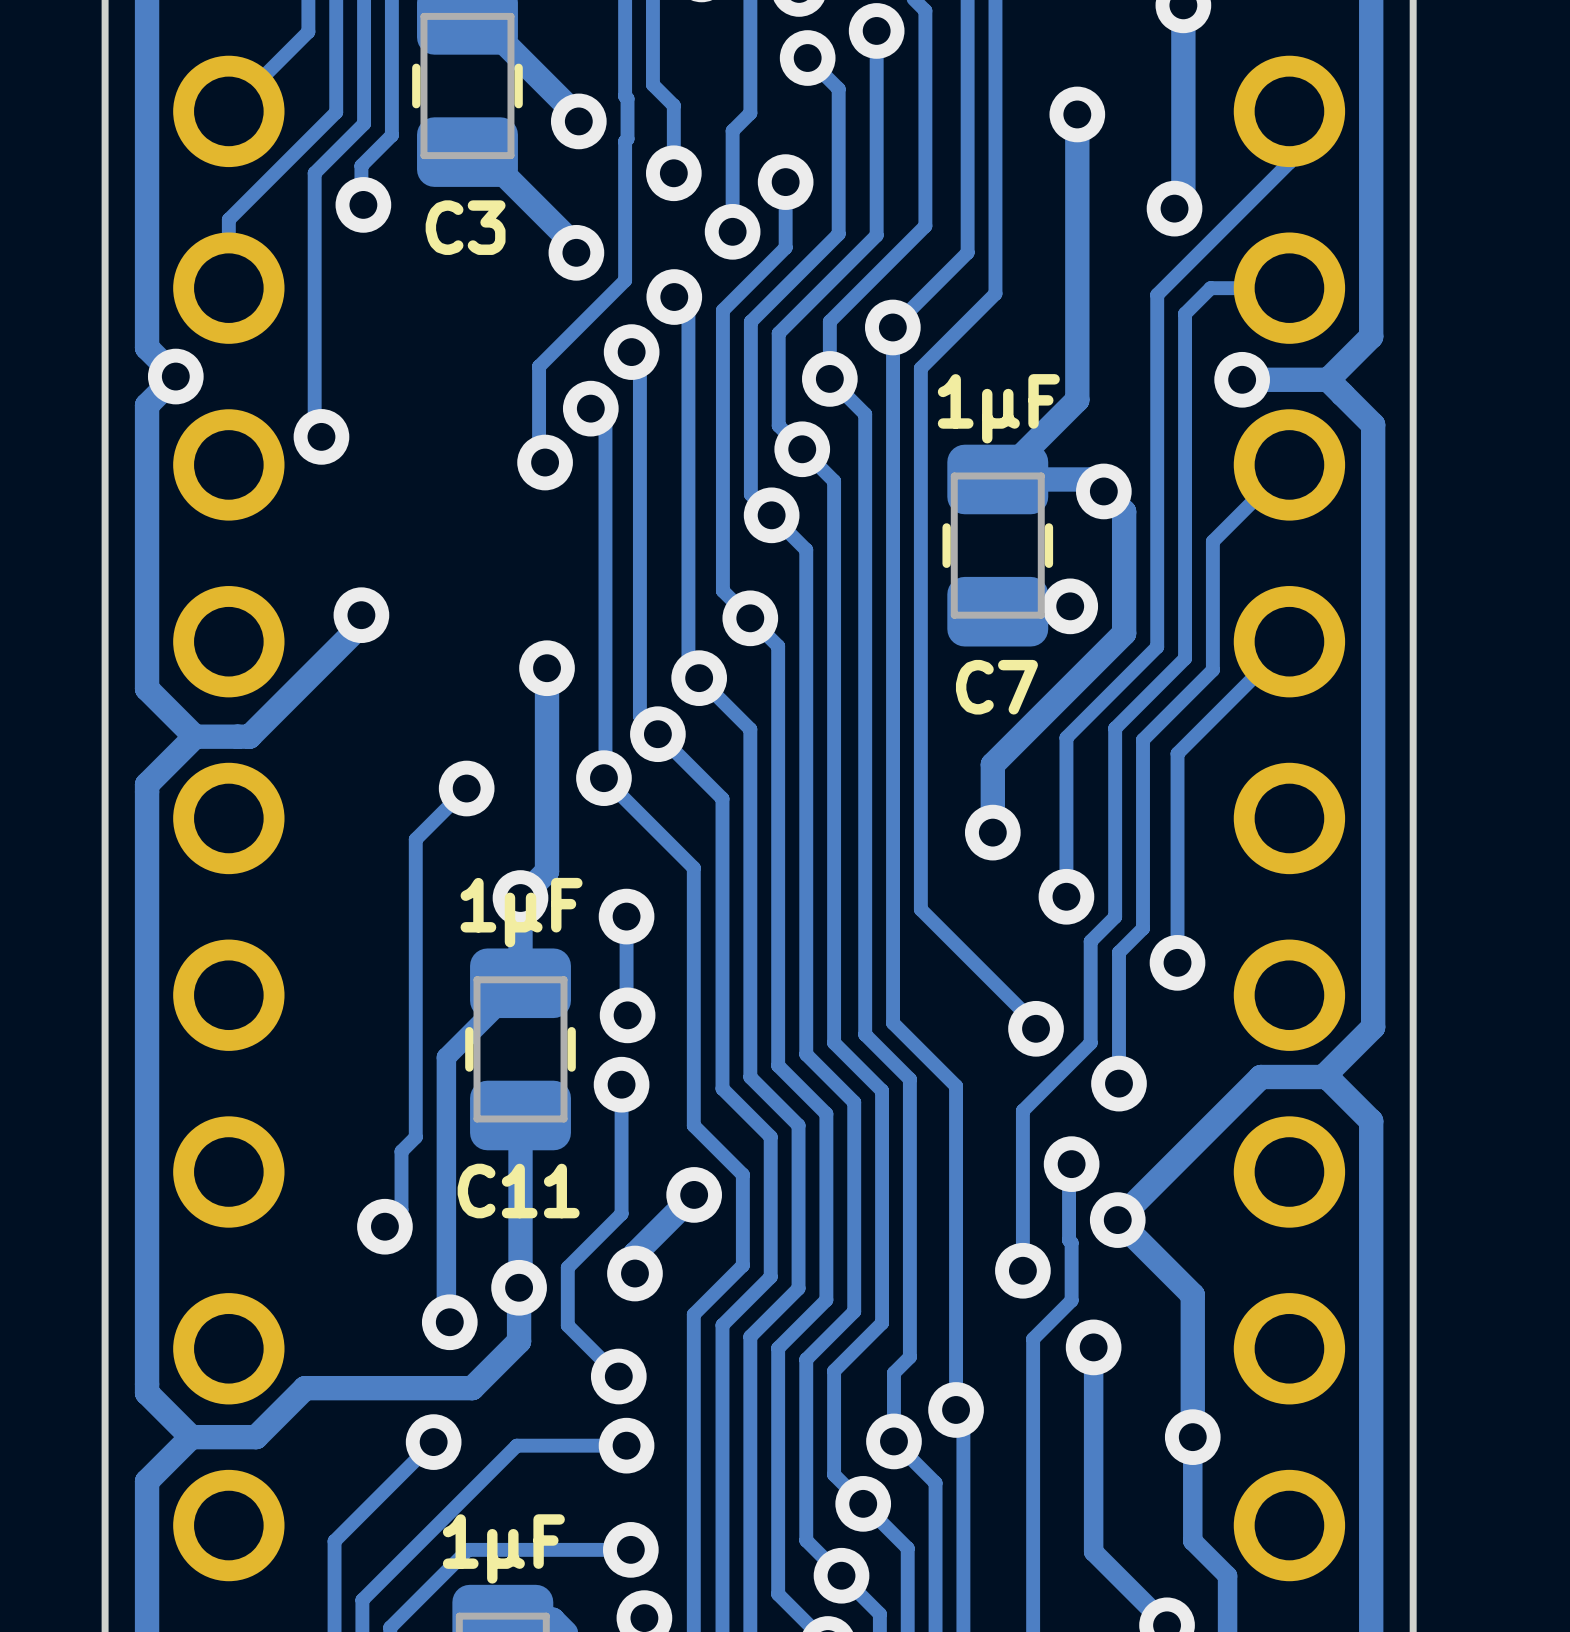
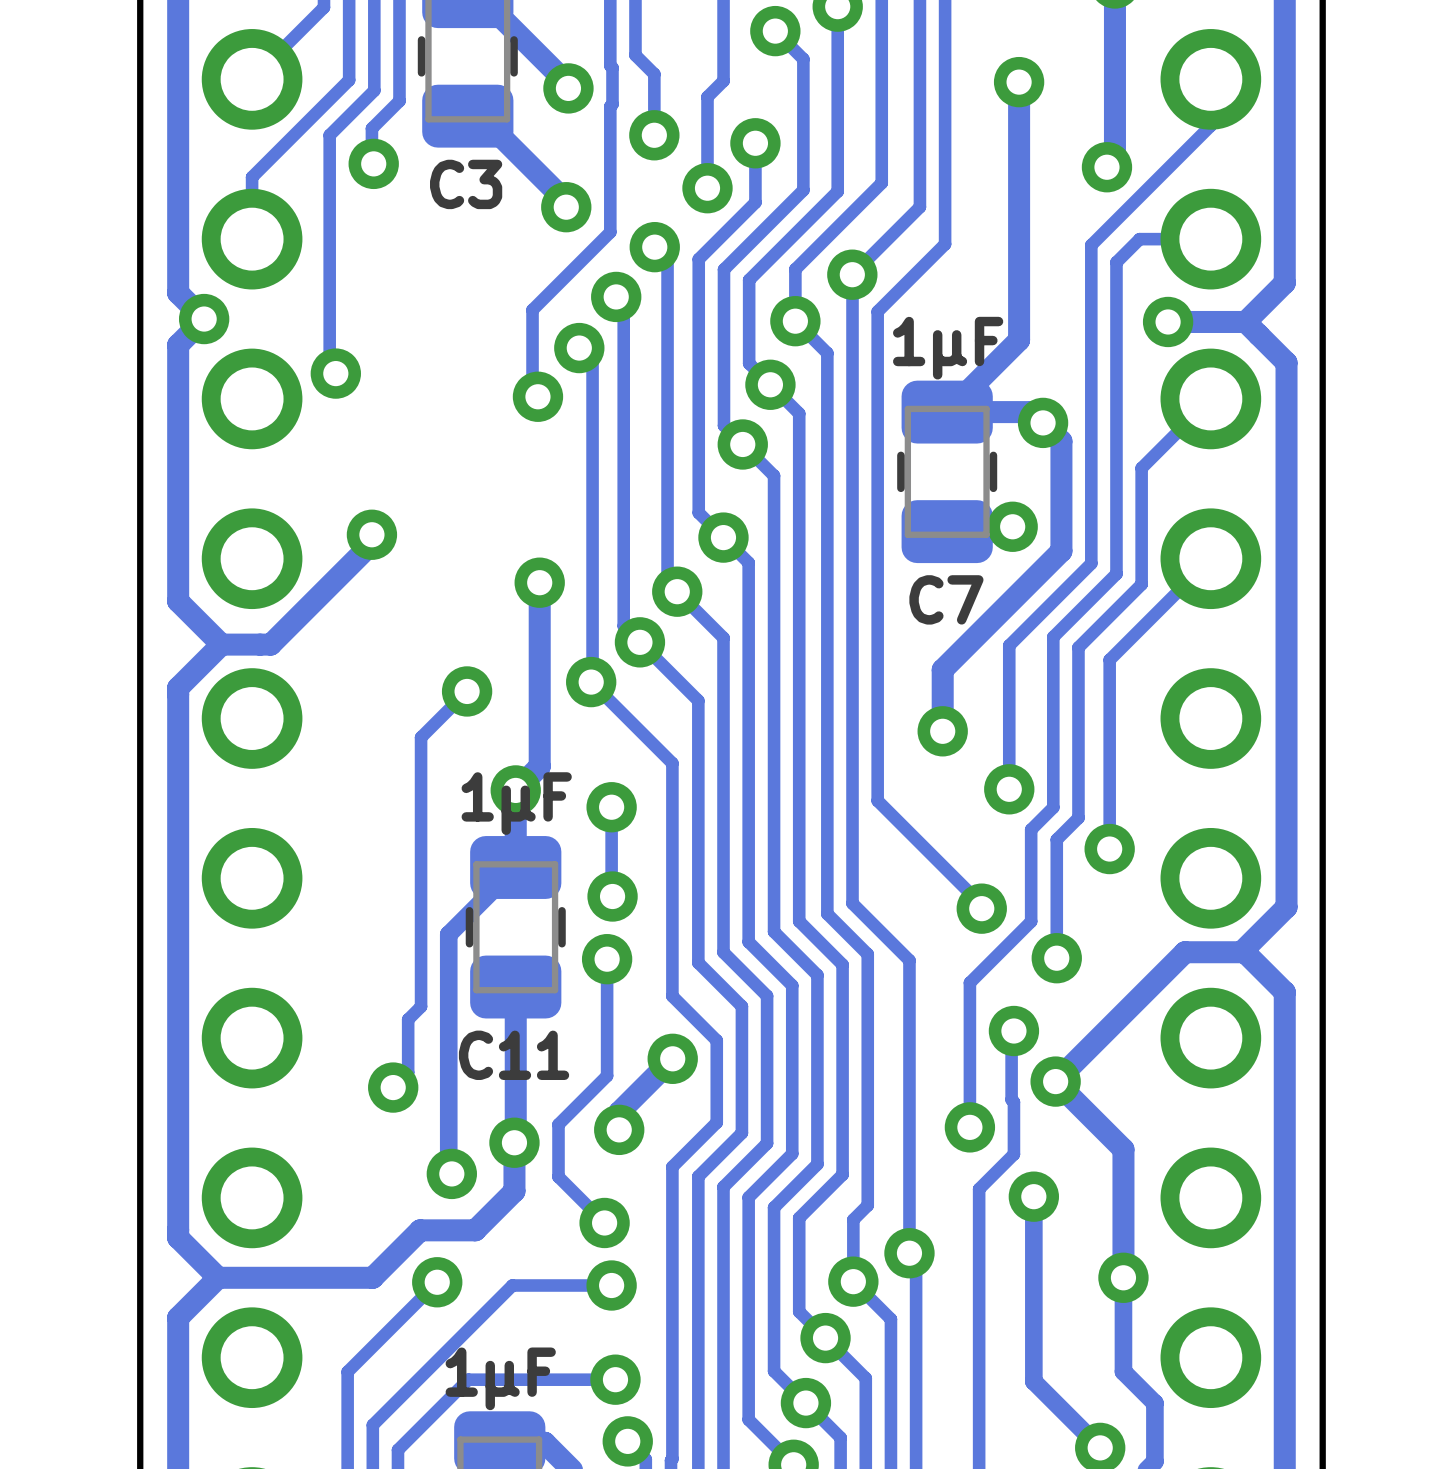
track: (475, 1384) (472, 1388) (305, 1388) (256, 1437) -> (475, 1230) (420, 1230) (372, 1277) (276, 1277)

